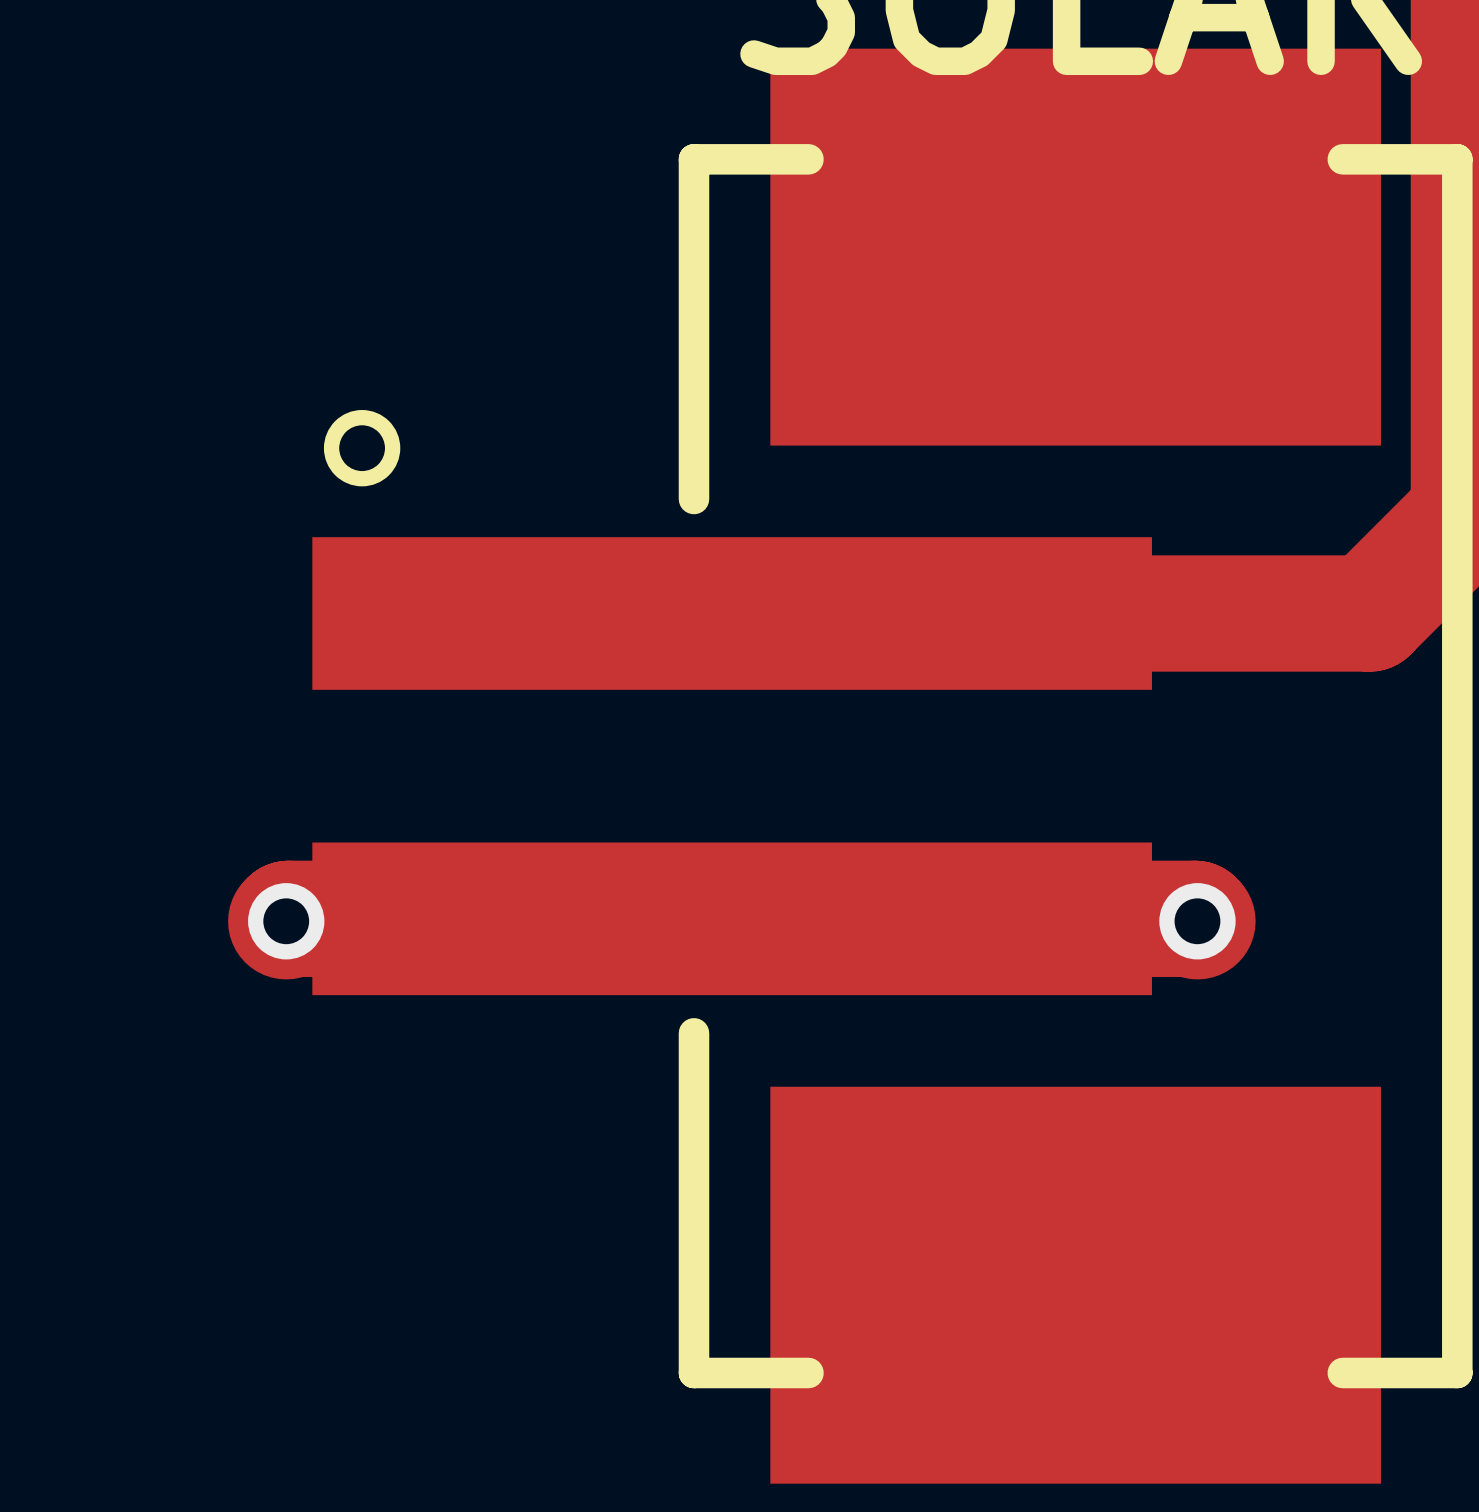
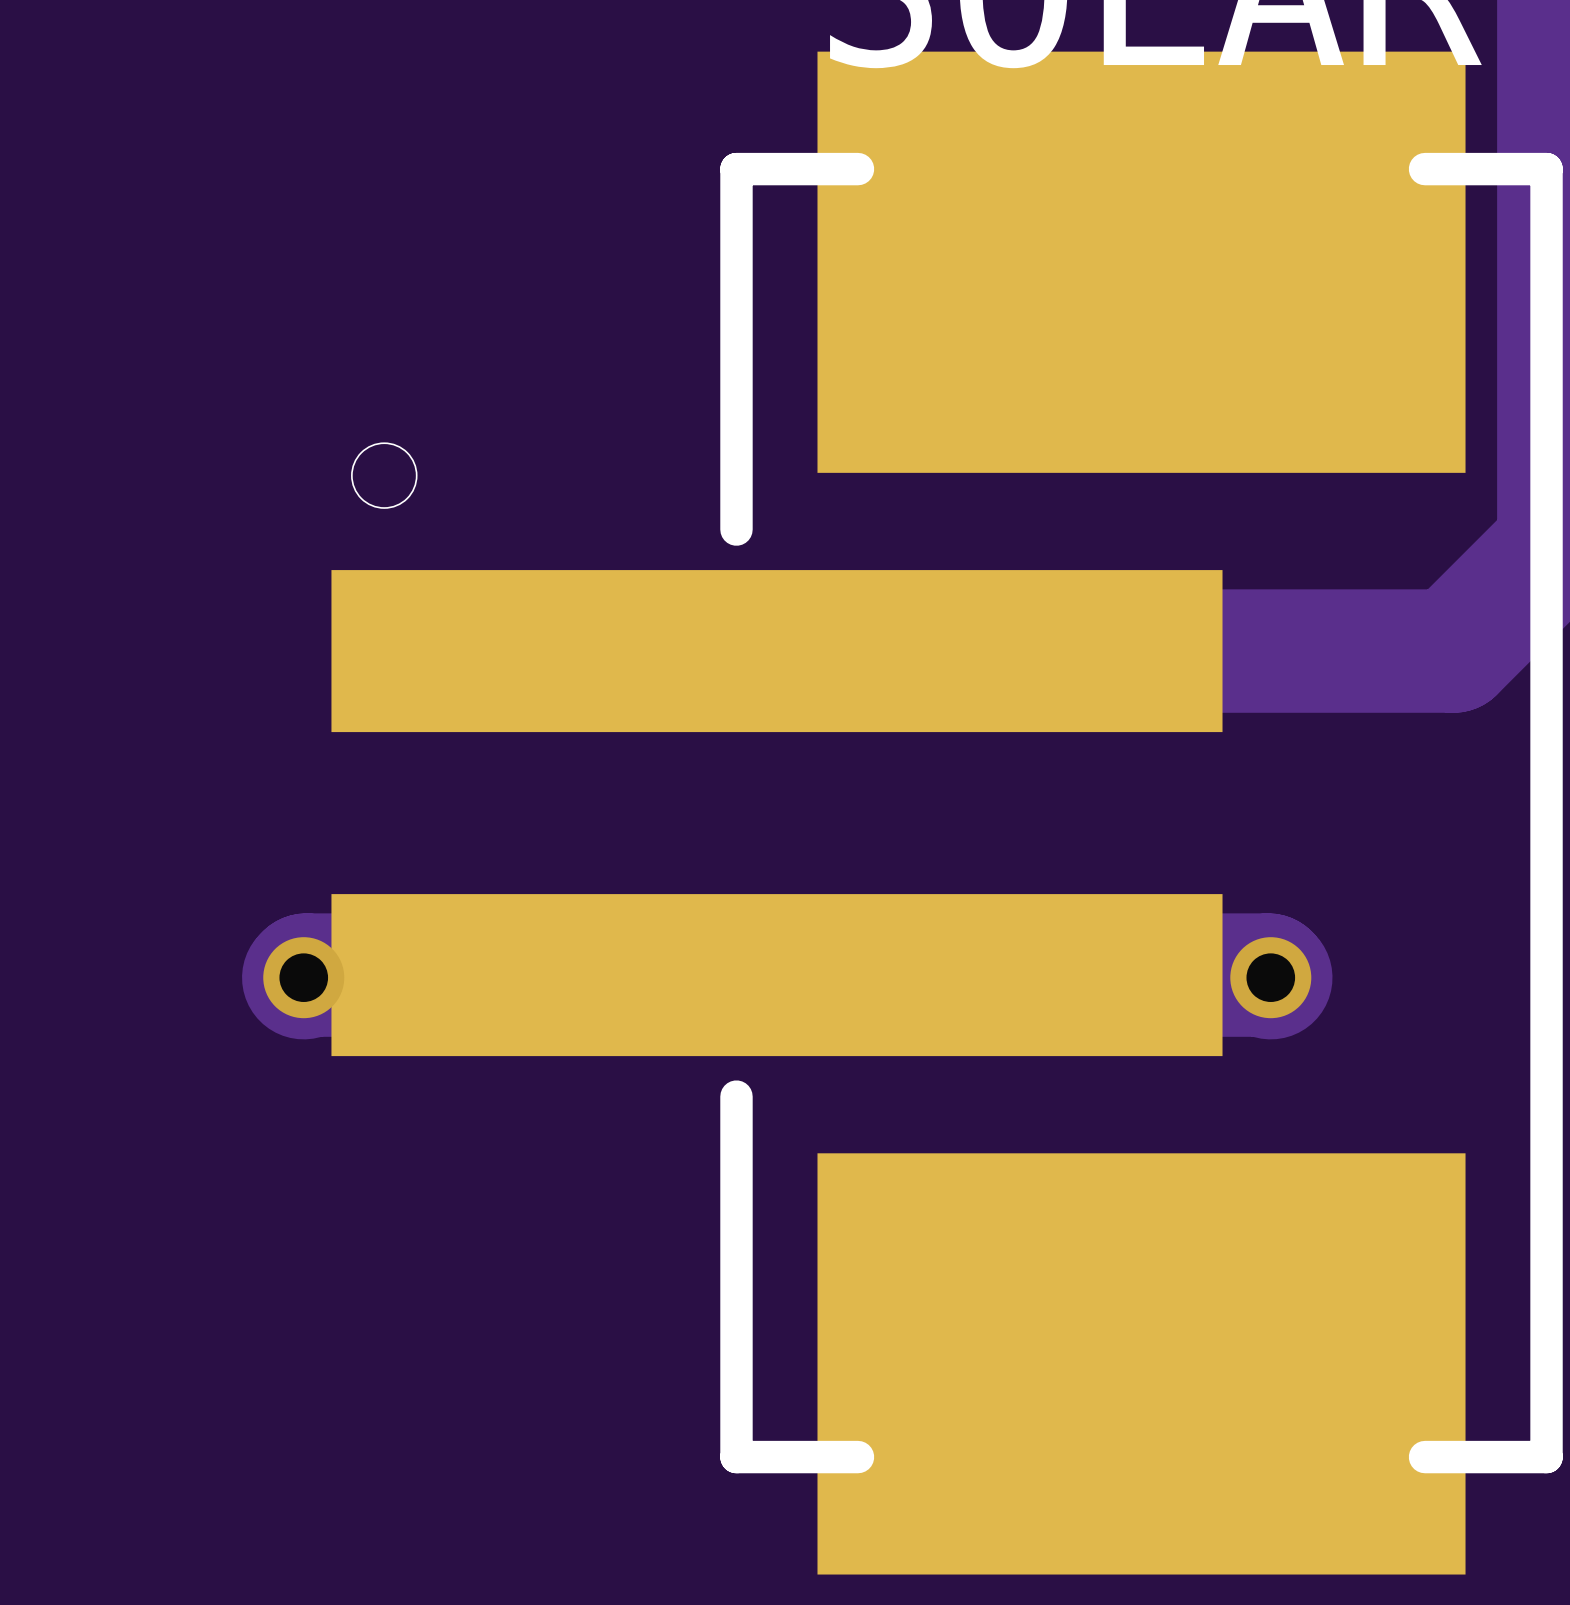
part footprint: [312, 48, 1473, 1484] -> [331, 51, 1563, 1575]

